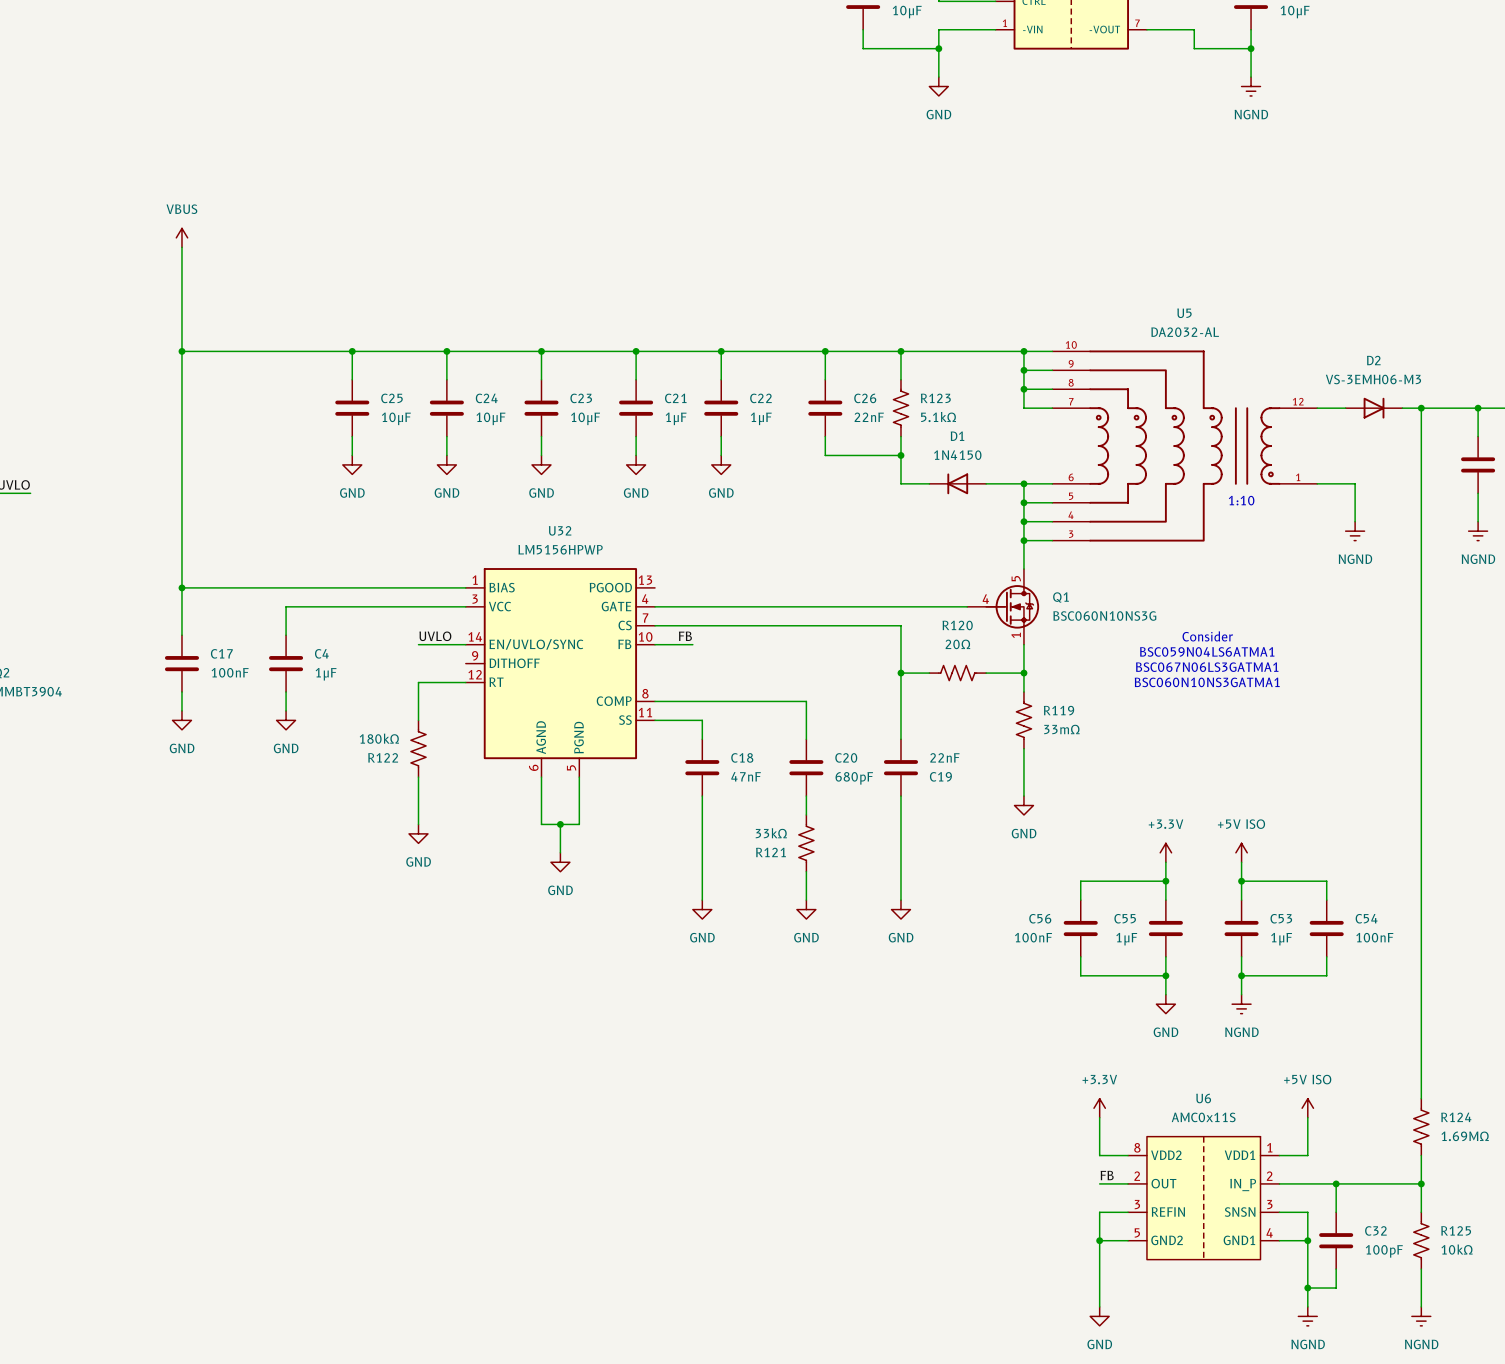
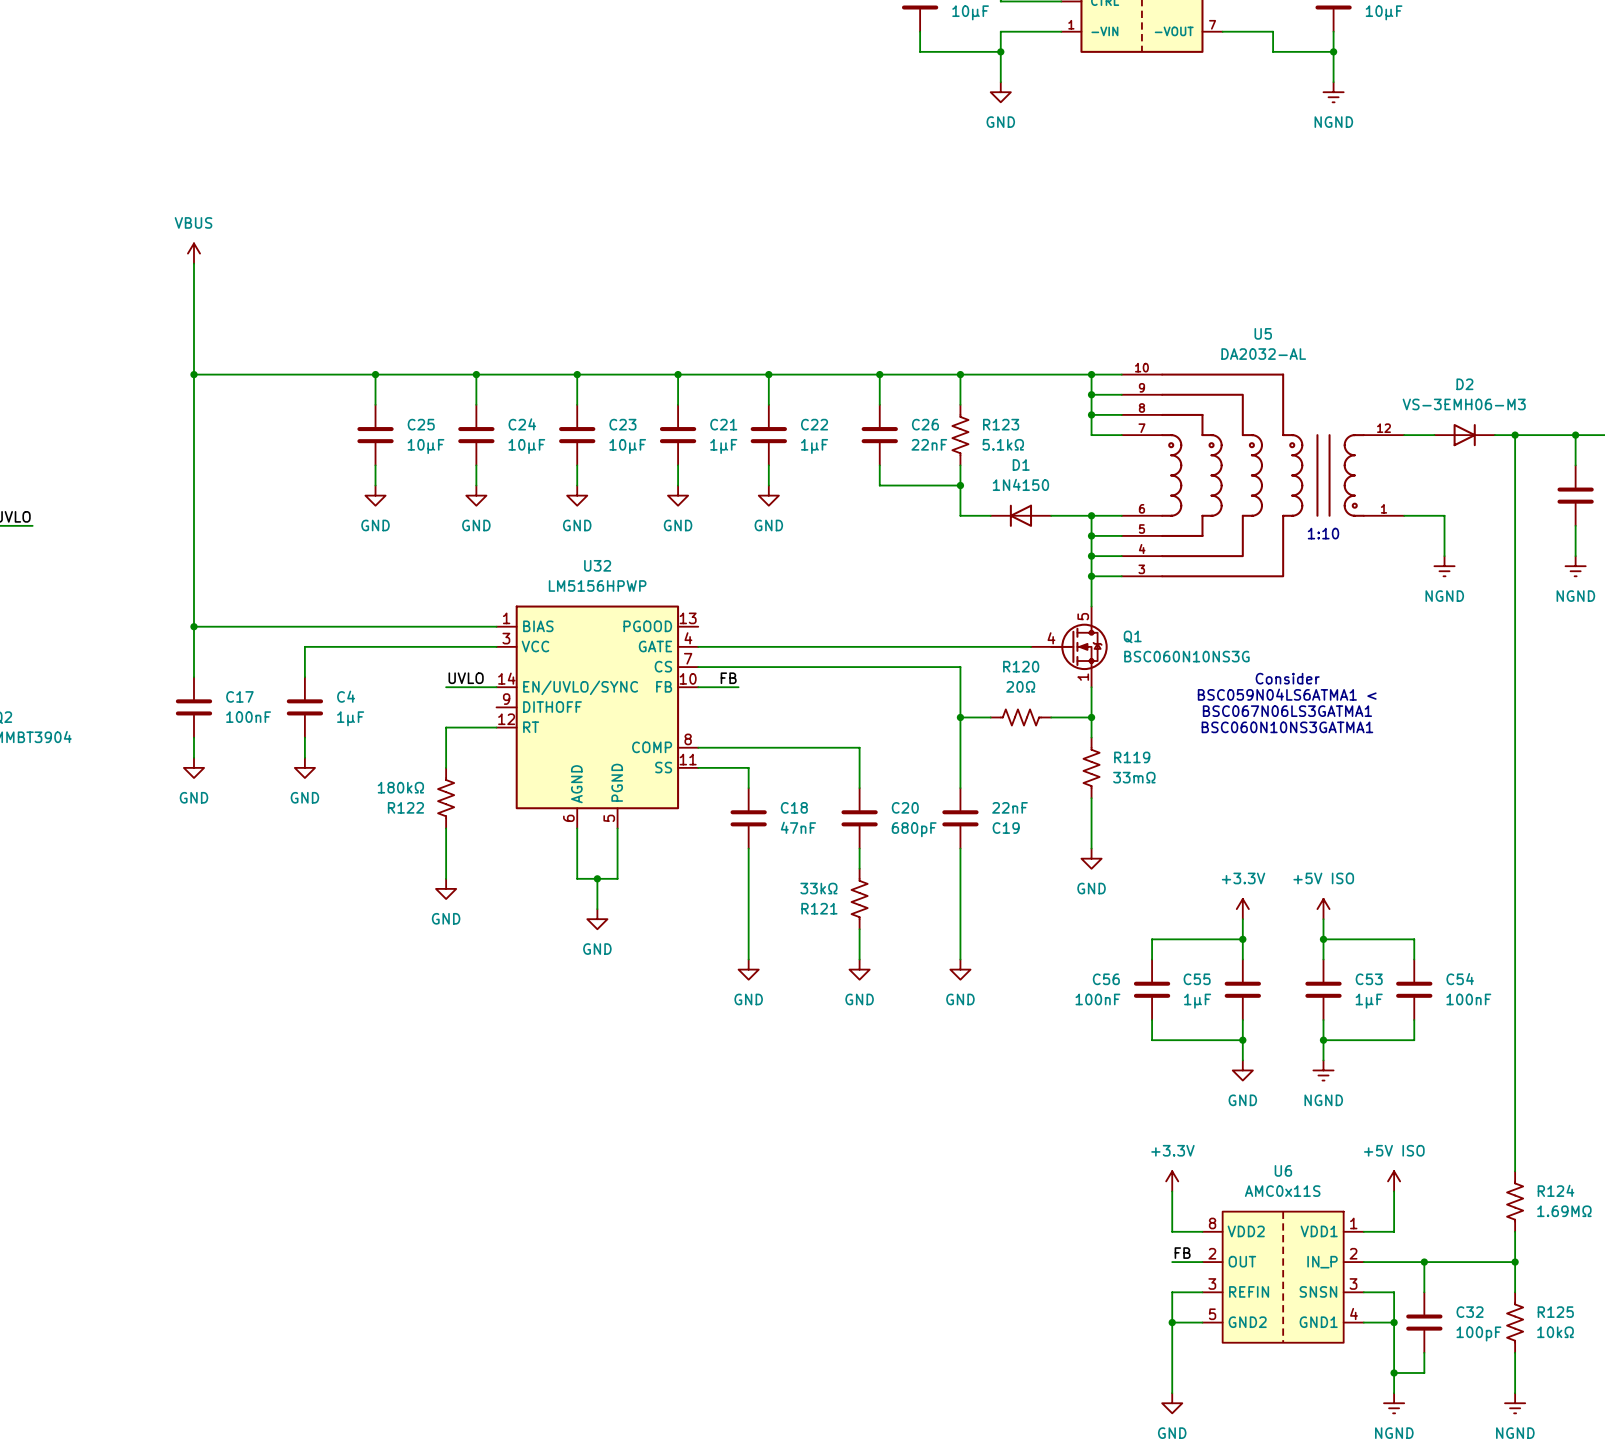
text: BSC059N04LS6ATMA1 (1207, 651) -> BSC059N04LS6ATMA1 < (1287, 694)

